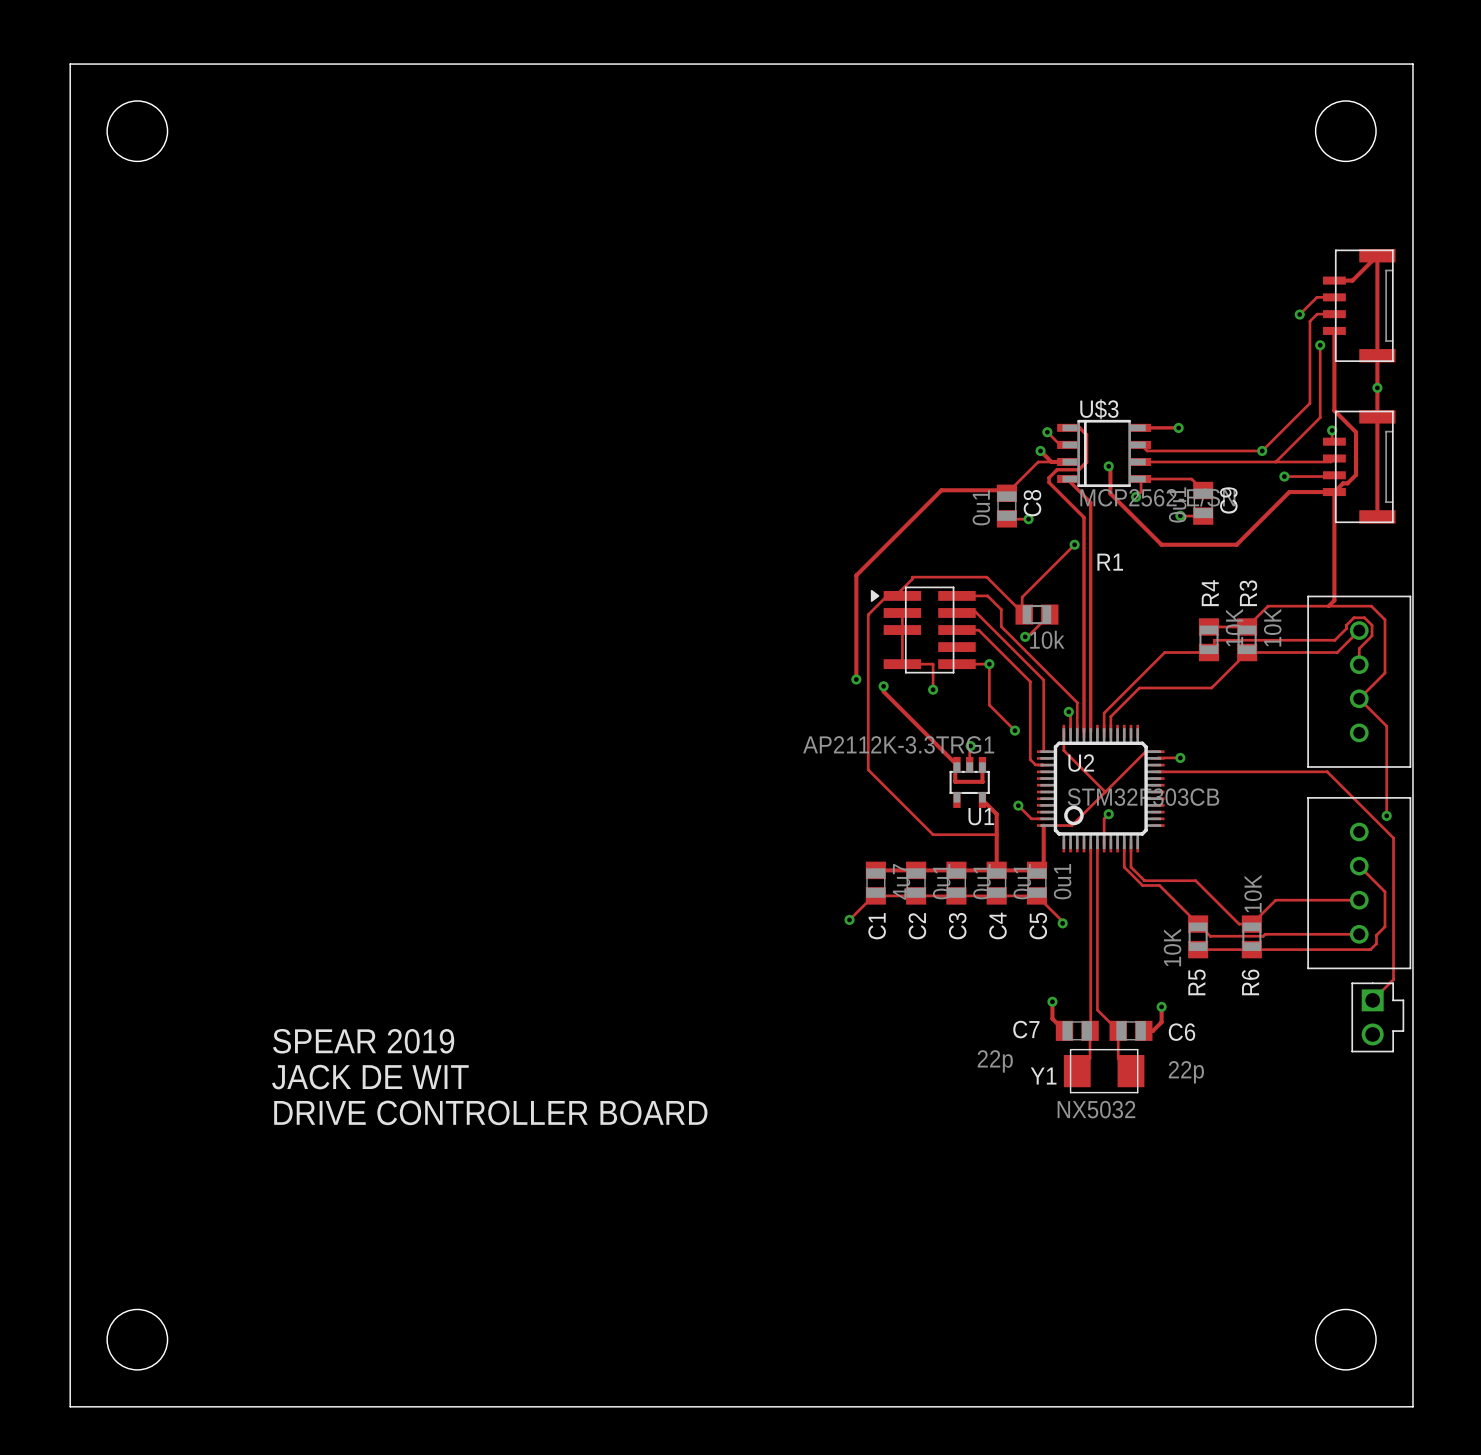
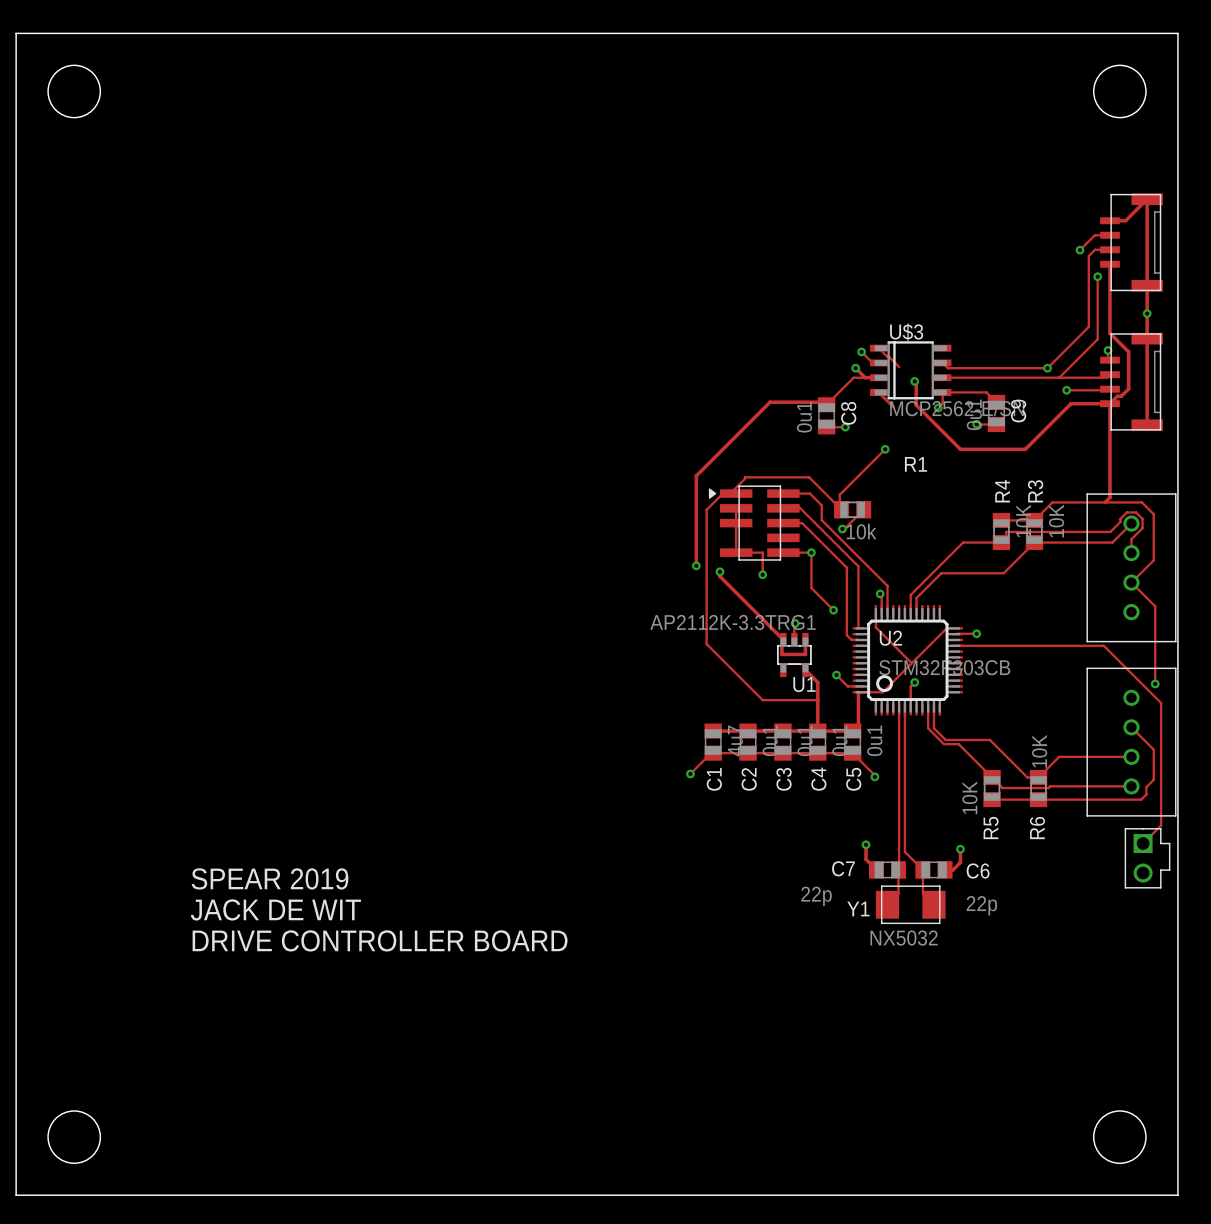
track: (1067, 427) (1079, 427) (1086, 434) (1086, 462) (1078, 469) (1057, 469) (1049, 477) (1049, 482) (1083, 517) (1083, 731) -> (878, 348) (899, 366)
track: (1141, 427) (1178, 427) -> none
via: (1178, 427) -> none
track: (1083, 495) (1090, 502) (1090, 731) -> none

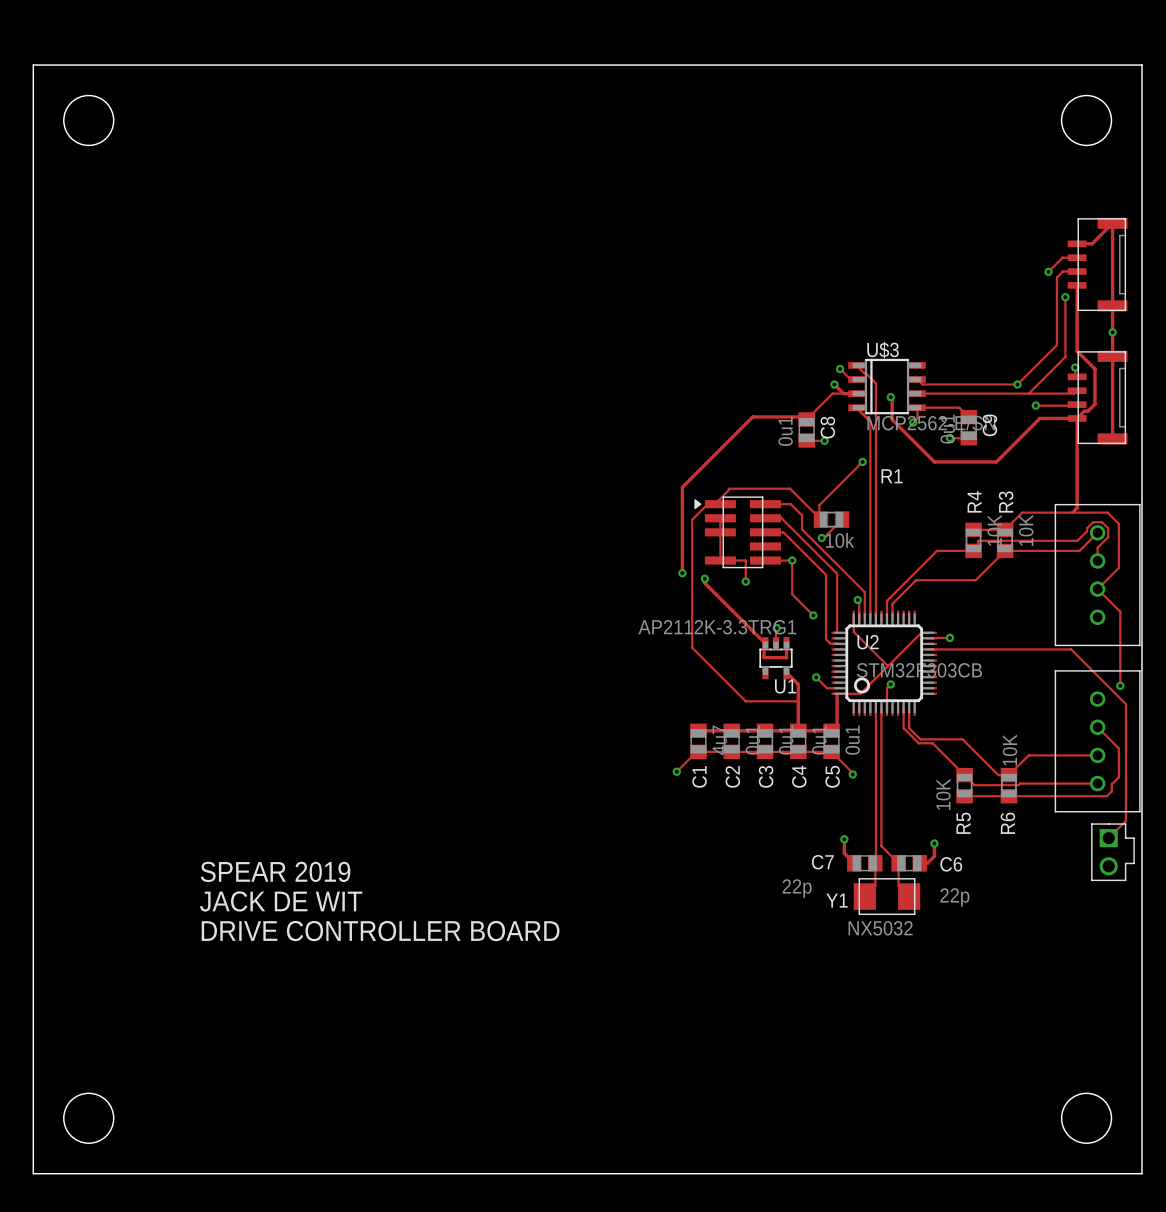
track: none -> (875, 383) (875, 616)
track: none -> (870, 421) (870, 616)

